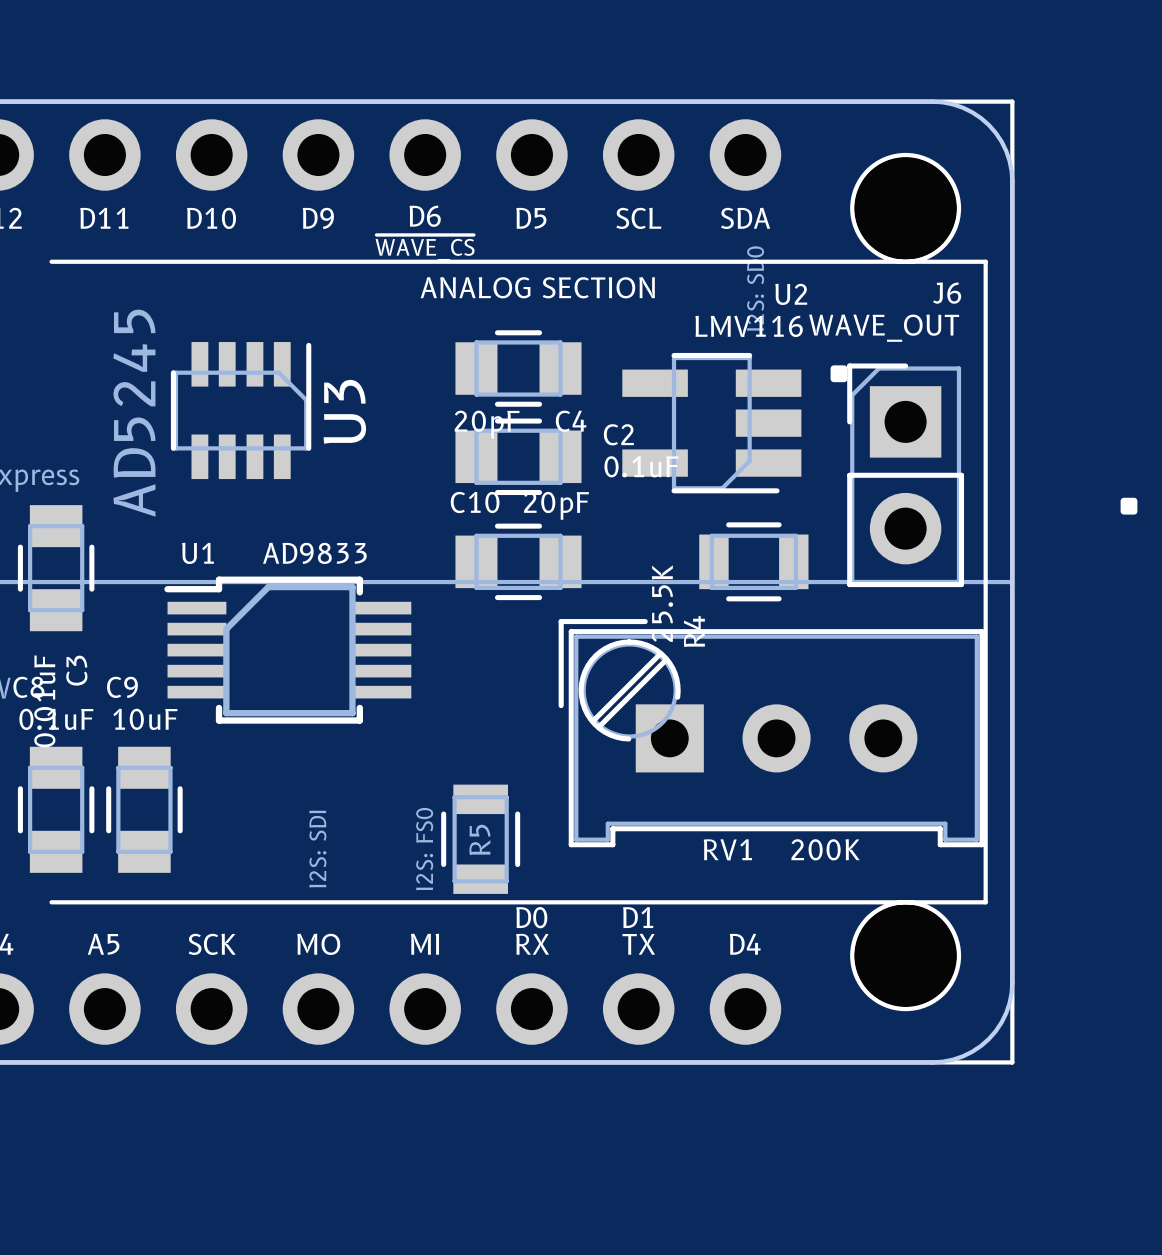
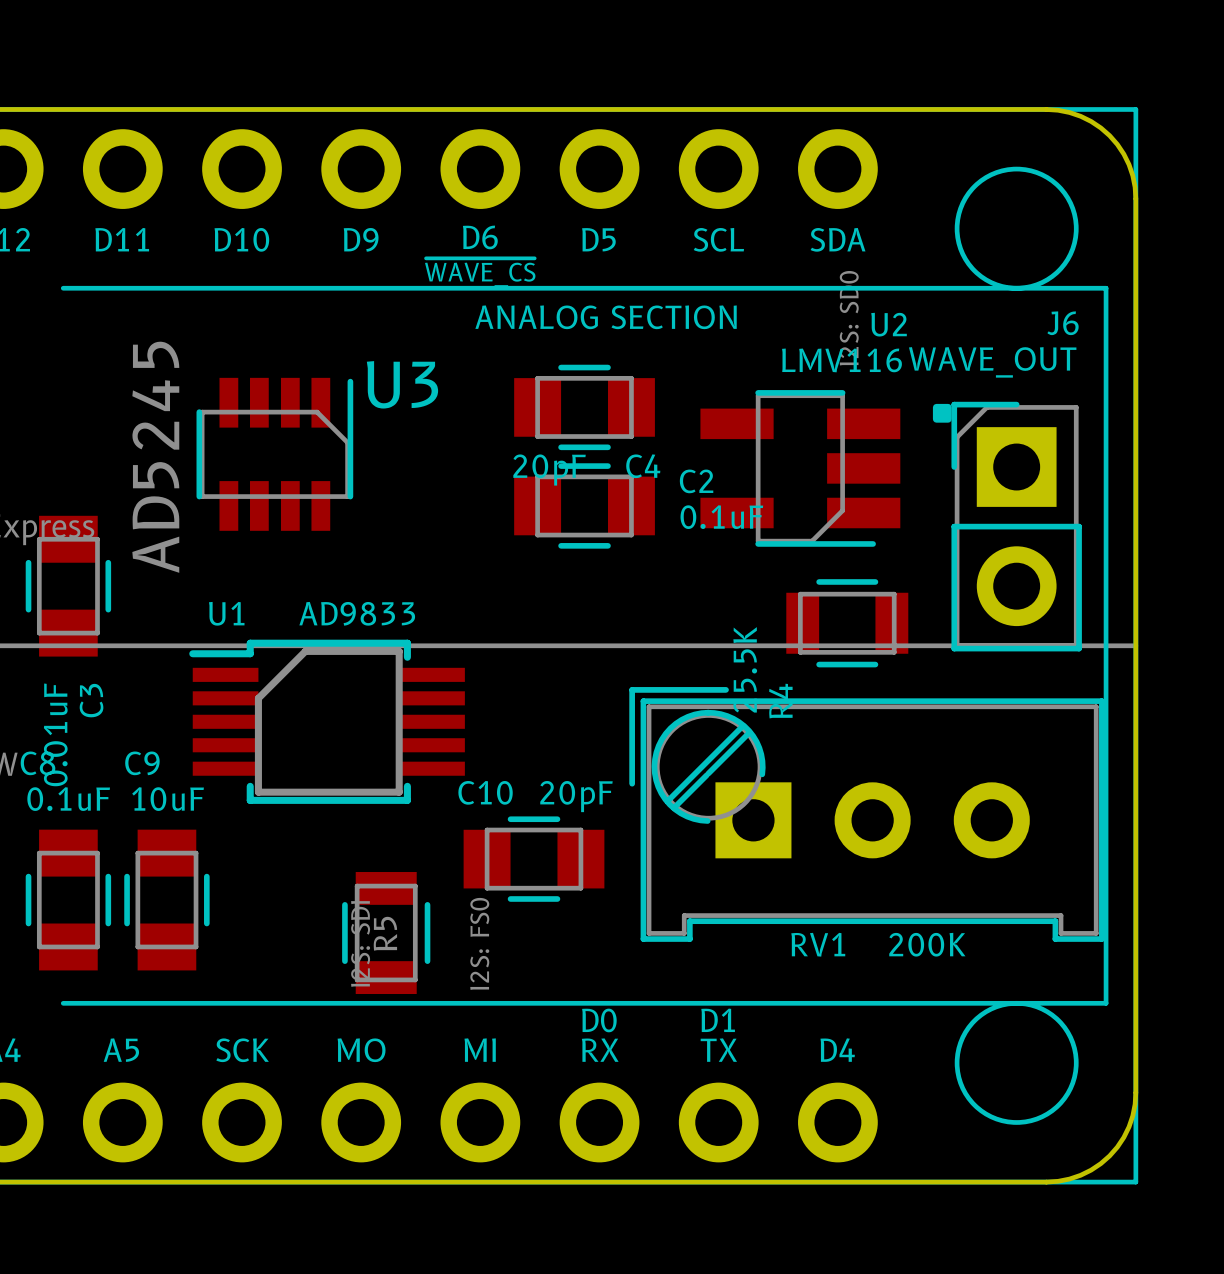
U3 name rotation: 0° (344, 411) -> 90° clockwise (402, 384)
C10 position: (518, 561) -> (534, 859)
C3 position: (56, 568) -> (68, 586)
R5 position: (480, 839) -> (386, 933)

